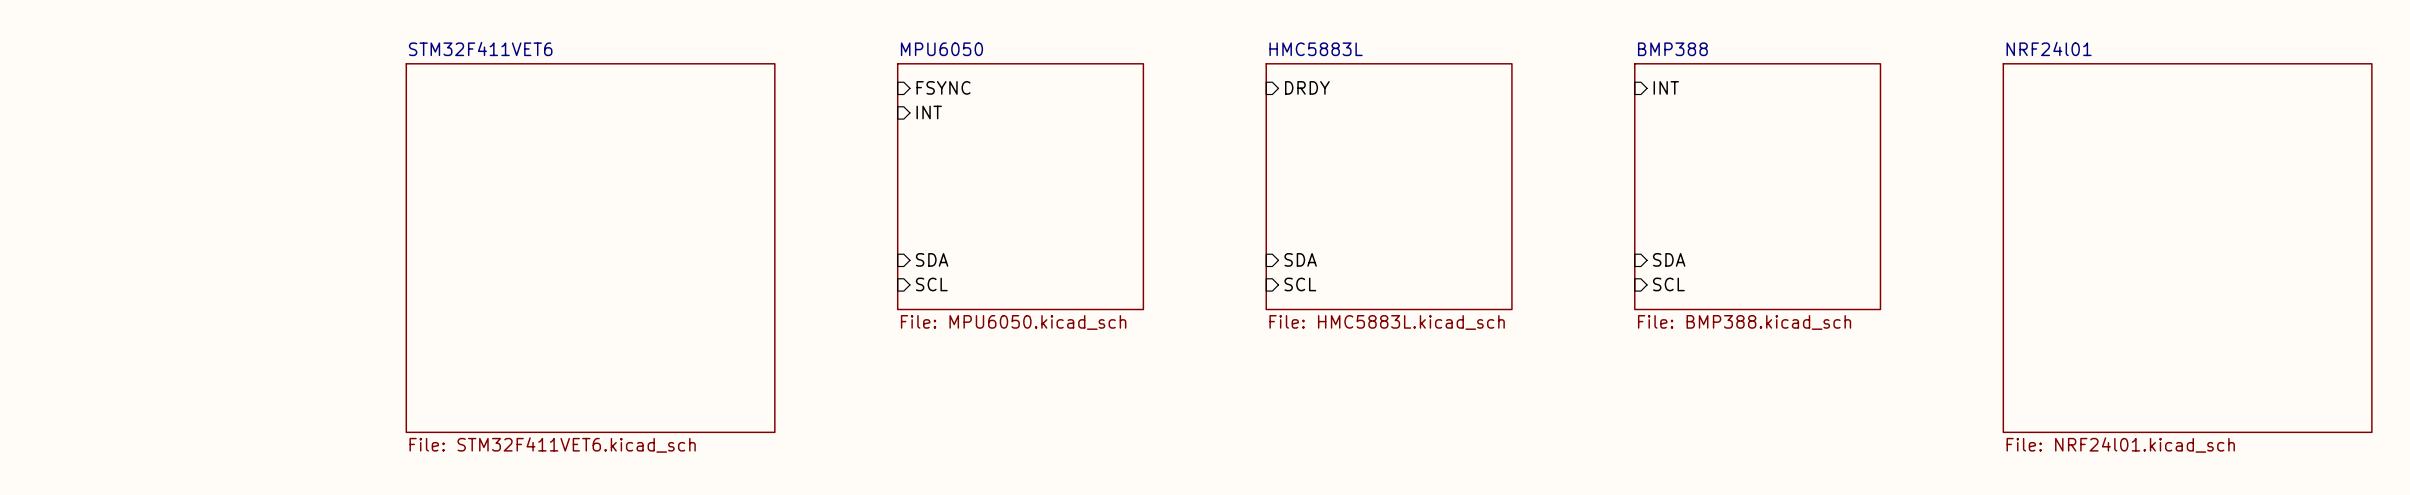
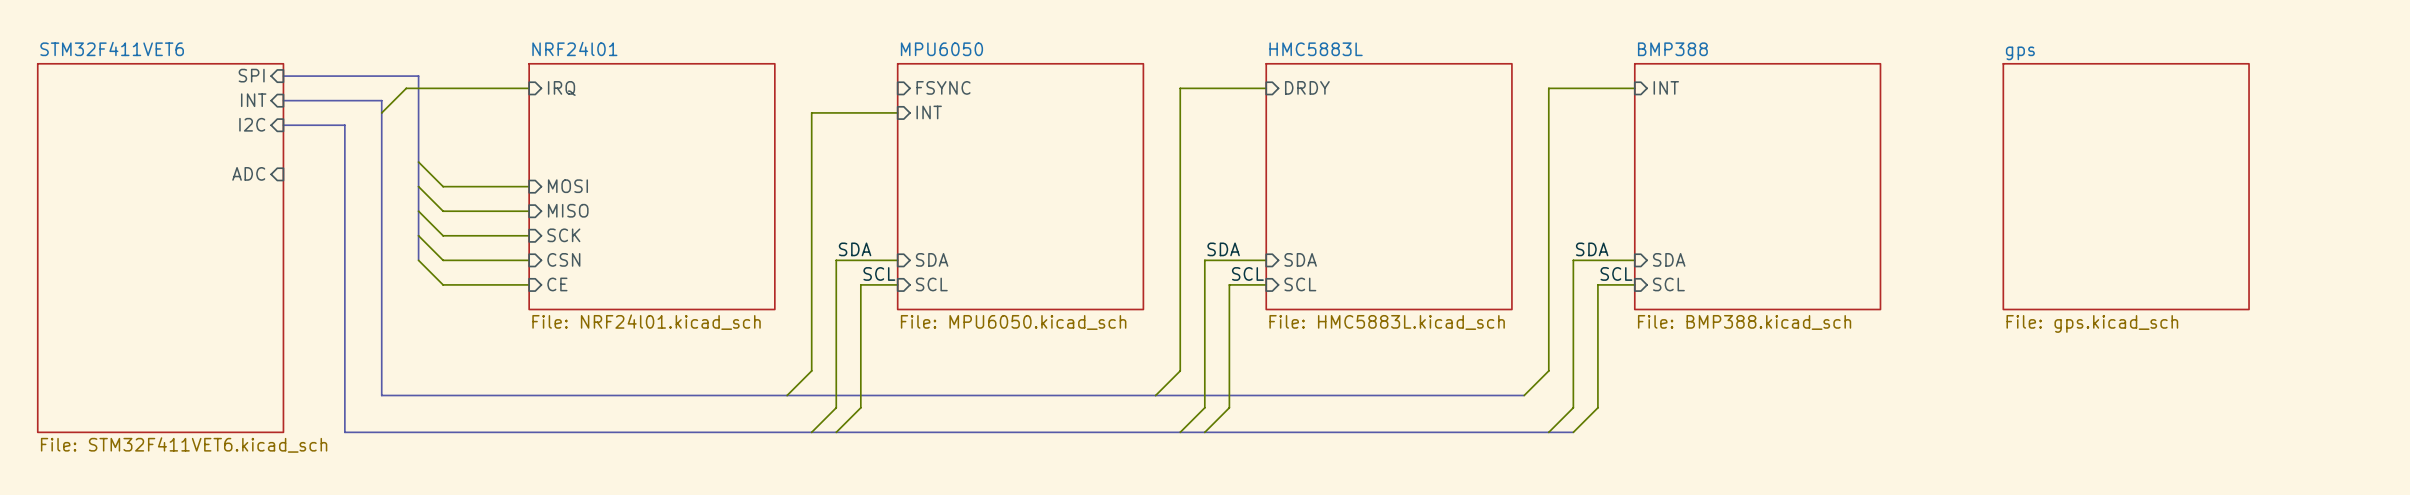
sheet STM32F411VET6 name position: STM32F411VET6 (480, 48) -> STM32F411VET6 (112, 48)
sheet NRF24l01 name position: NRF24l01 (2049, 48) -> NRF24l01 (574, 48)
sheet STM32F411VET6 shape: [405, 63, 776, 434] -> [37, 63, 285, 434]
sheet NRF24l01 shape: [2002, 63, 2373, 434] -> [528, 63, 776, 311]
sheet pin: none -> SPI (251, 75)
bus: none -> (283, 76) (418, 76) (418, 260)
wire: none -> (529, 88) (406, 88) (381, 112)
sheet pin: none -> IRQ (561, 88)
wire: none -> (1266, 88) (1180, 88) (1180, 370) (1155, 395)
wire: none -> (1634, 88) (1548, 88) (1548, 370) (1524, 395)
sheet pin: none -> INT (253, 100)
bus: none -> (283, 100) (381, 100) (381, 395) (1524, 395)
wire: none -> (897, 112) (811, 112) (811, 370) (787, 395)
sheet pin: none -> I2C (252, 124)
bus: none -> (283, 125) (344, 125) (344, 432) (1573, 432)
wire: none -> (418, 162) (443, 186) (529, 186)
sheet pin: none -> ADC (248, 173)
wire: none -> (418, 186) (443, 211) (529, 211)
sheet pin: none -> MOSI (567, 186)
sheet gps: none -> File: gps.kicad_sch (2126, 186)
sheet pin: none -> MISO (568, 210)
wire: none -> (418, 211) (443, 235) (529, 235)
wire: none -> (418, 235) (443, 260) (529, 260)
sheet pin: none -> SCK (563, 235)
label: none -> SDA (855, 249)
label: none -> SDA (1223, 249)
label: none -> SDA (1592, 249)
sheet pin: none -> CSN (563, 259)
wire: none -> (418, 260) (443, 284) (529, 284)
wire: none -> (897, 260) (836, 260) (836, 407) (811, 432)
wire: none -> (1266, 260) (1204, 260) (1204, 407) (1180, 432)
wire: none -> (1634, 260) (1573, 260) (1573, 407) (1548, 432)
label: none -> SCL (879, 273)
label: none -> SCL (1247, 273)
label: none -> SCL (1616, 273)
sheet pin: none -> CE (557, 284)
wire: none -> (897, 284) (860, 284) (860, 407) (836, 432)
wire: none -> (1266, 284) (1229, 284) (1229, 407) (1204, 432)
wire: none -> (1634, 284) (1597, 284) (1597, 407) (1573, 432)
sheet STM32F411VET6 value position: File: STM32F411VET6.kicad_sch (552, 445) -> File: STM32F411VET6.kicad_sch (184, 445)
sheet NRF24l01 value position: File: NRF24l01.kicad_sch (2120, 445) -> File: NRF24l01.kicad_sch (646, 322)

